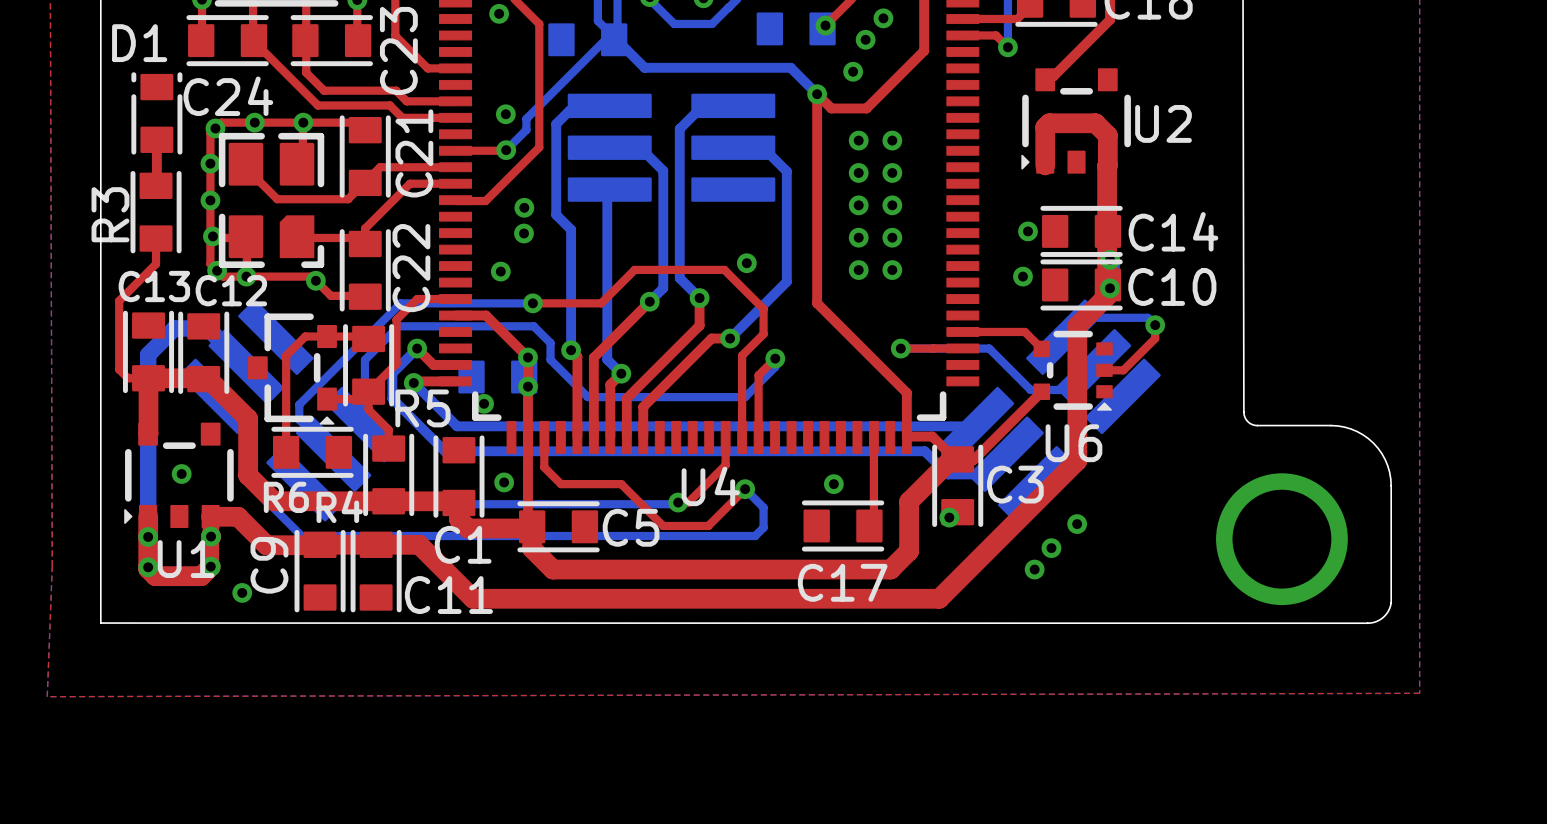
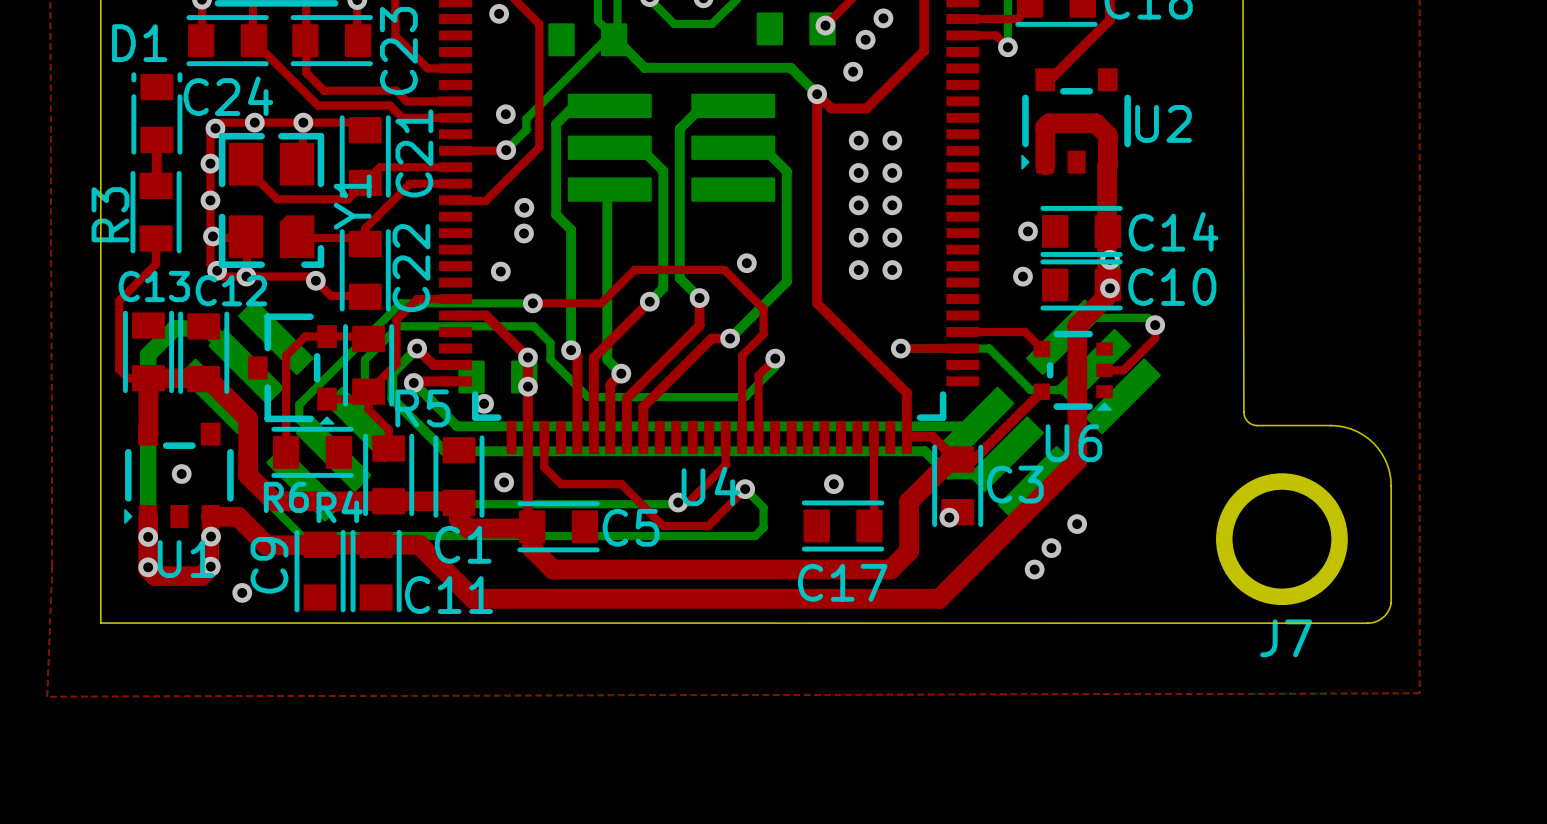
Y1 name: none -> Y1 (352, 202)
J7 name: none -> J7 (1286, 638)

